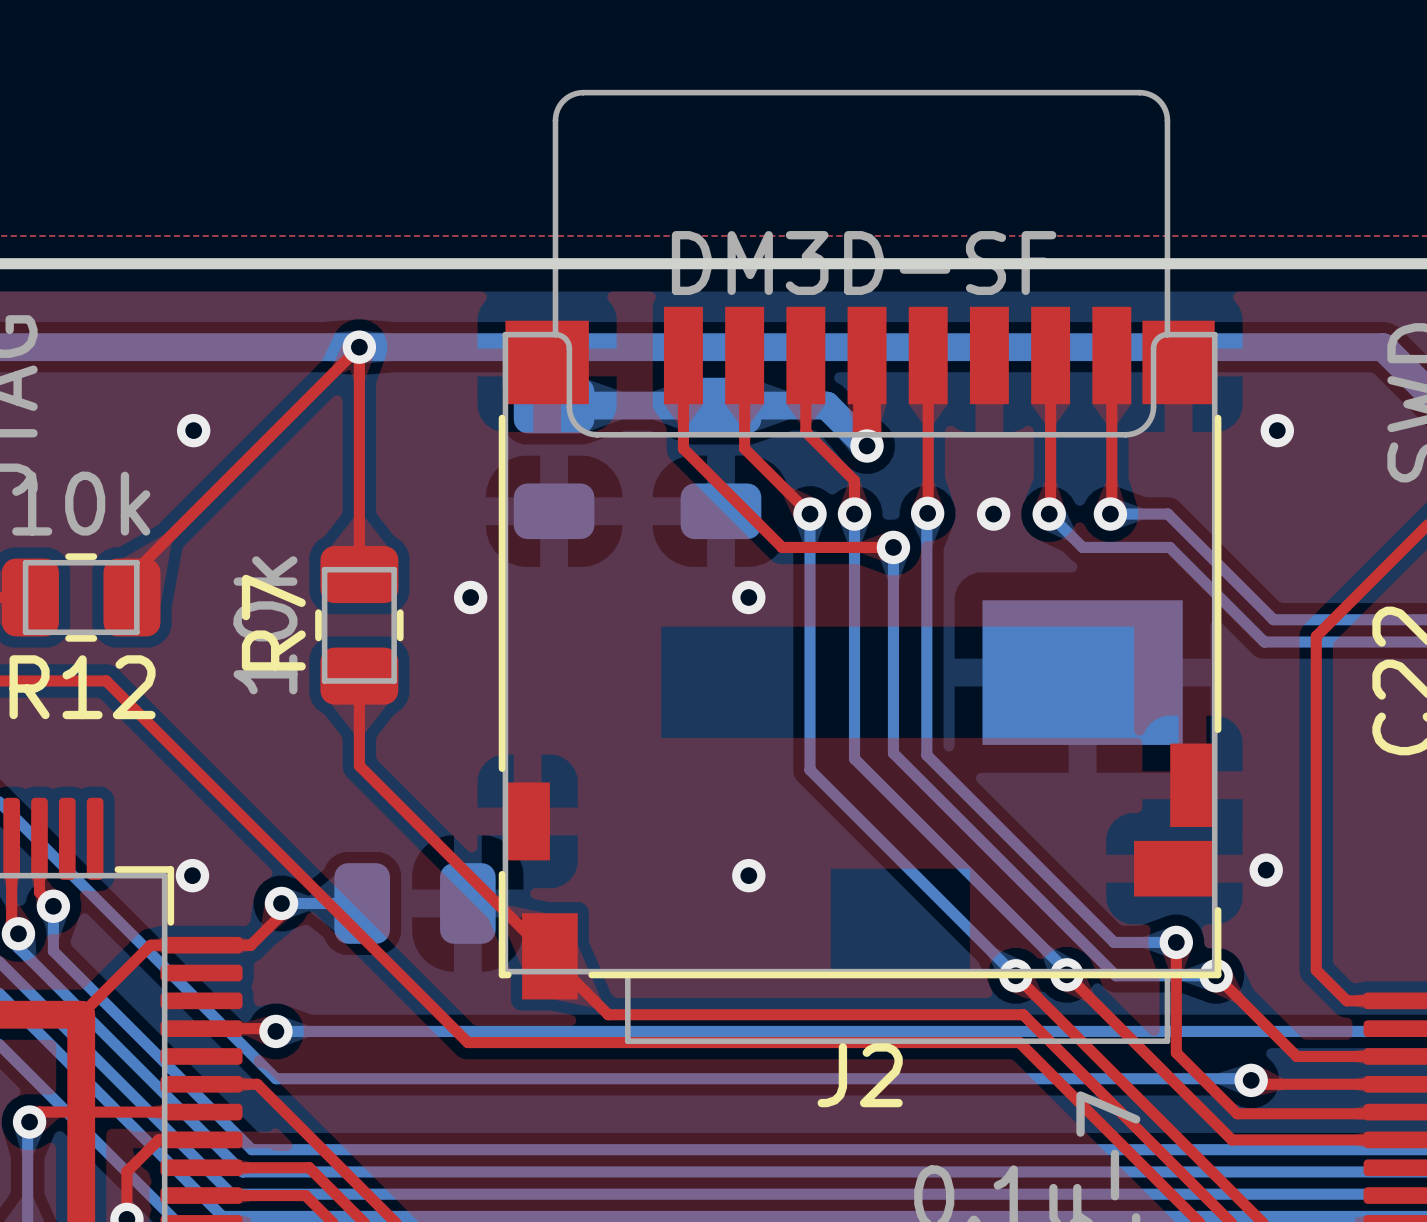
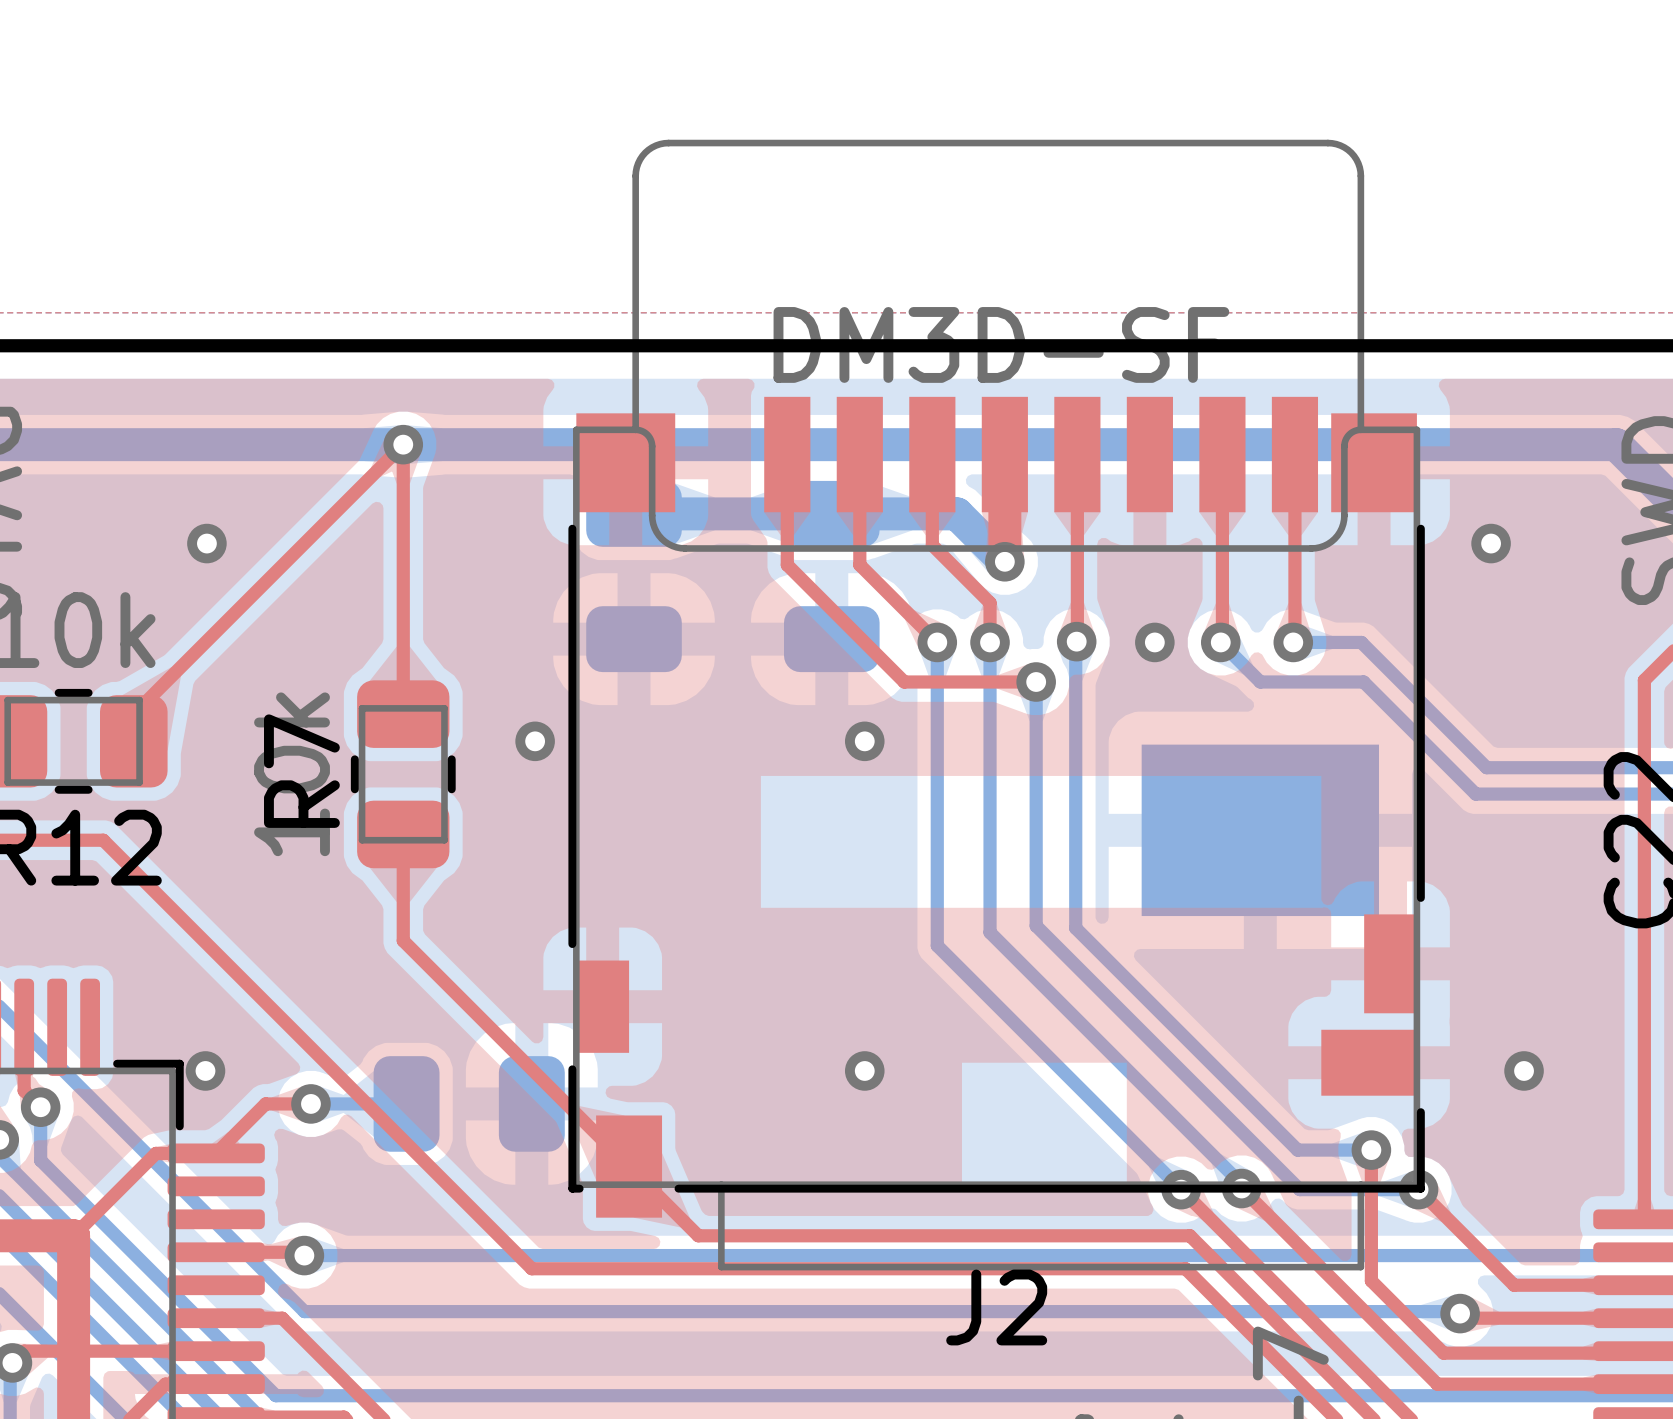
top track: (1406, 546) (1316, 636) (1316, 970) (1346, 1000) (1406, 1000) -> (1644, 680) (1644, 1219)
via position: (1266, 870) -> (1524, 1070)
top track: (281, 903) (281, 914) (250, 945) (201, 945) -> (310, 1103) (265, 1103) (216, 1153)

